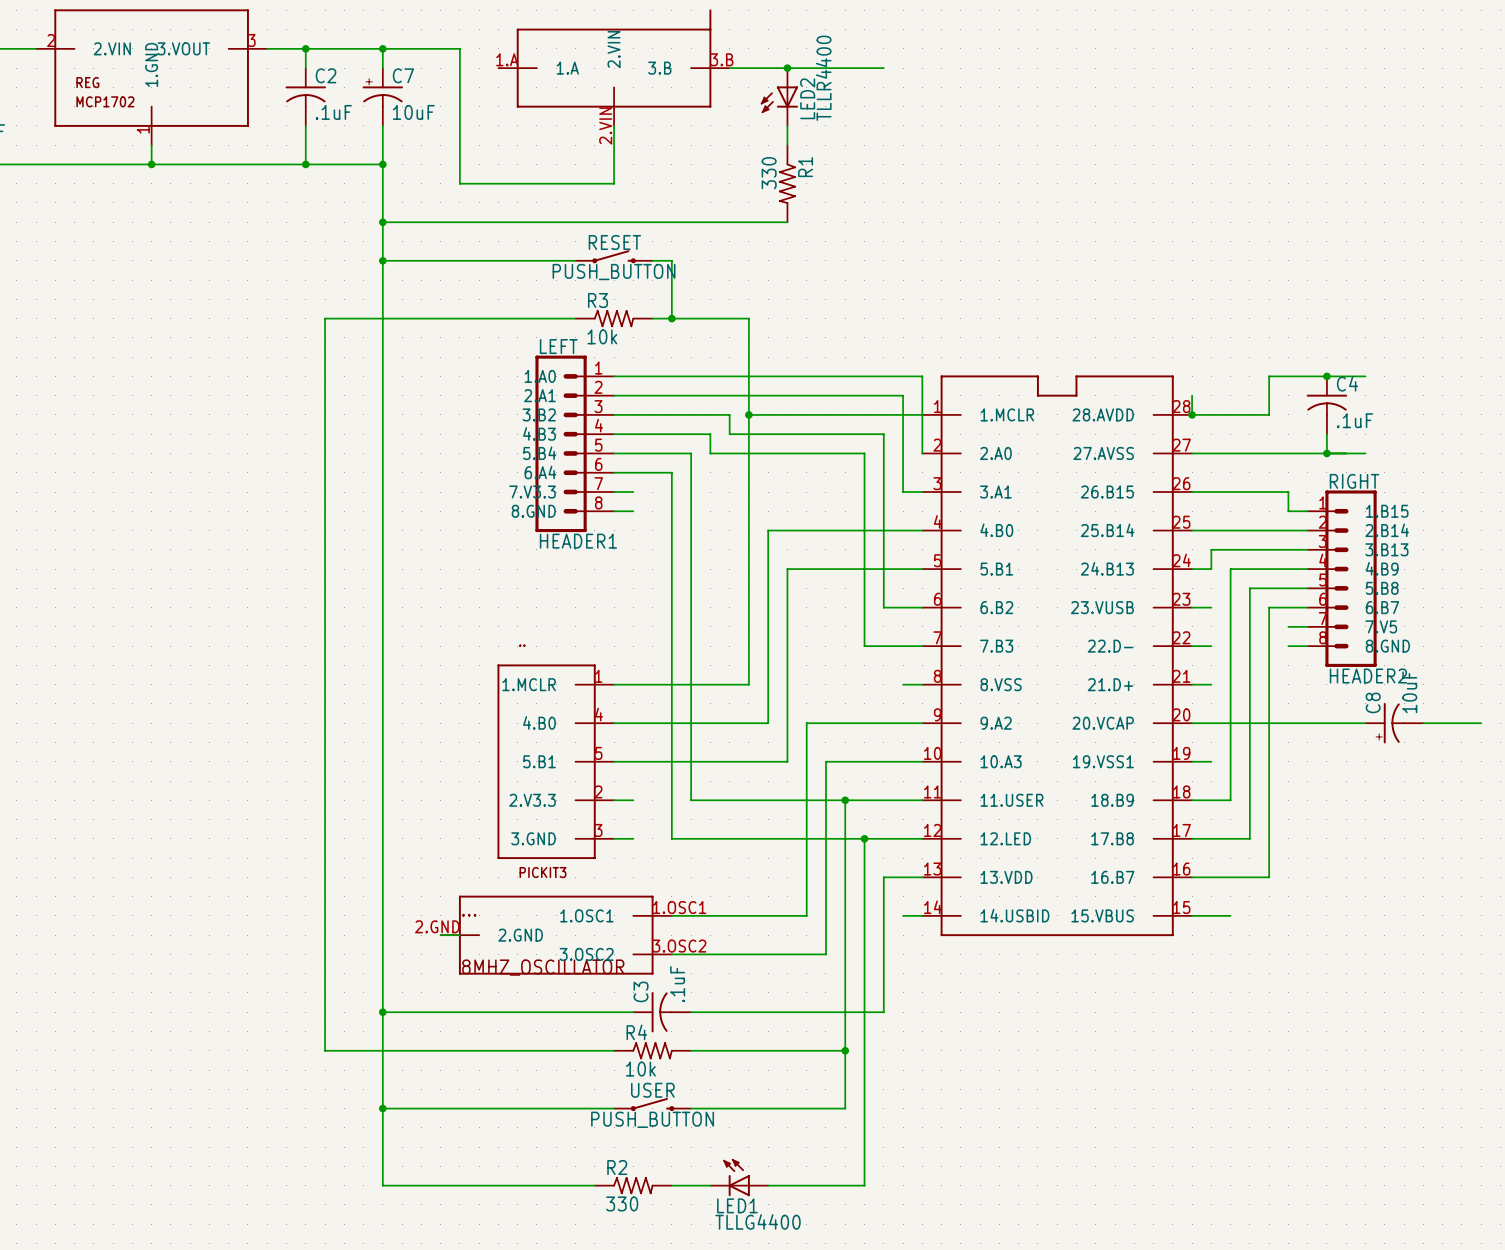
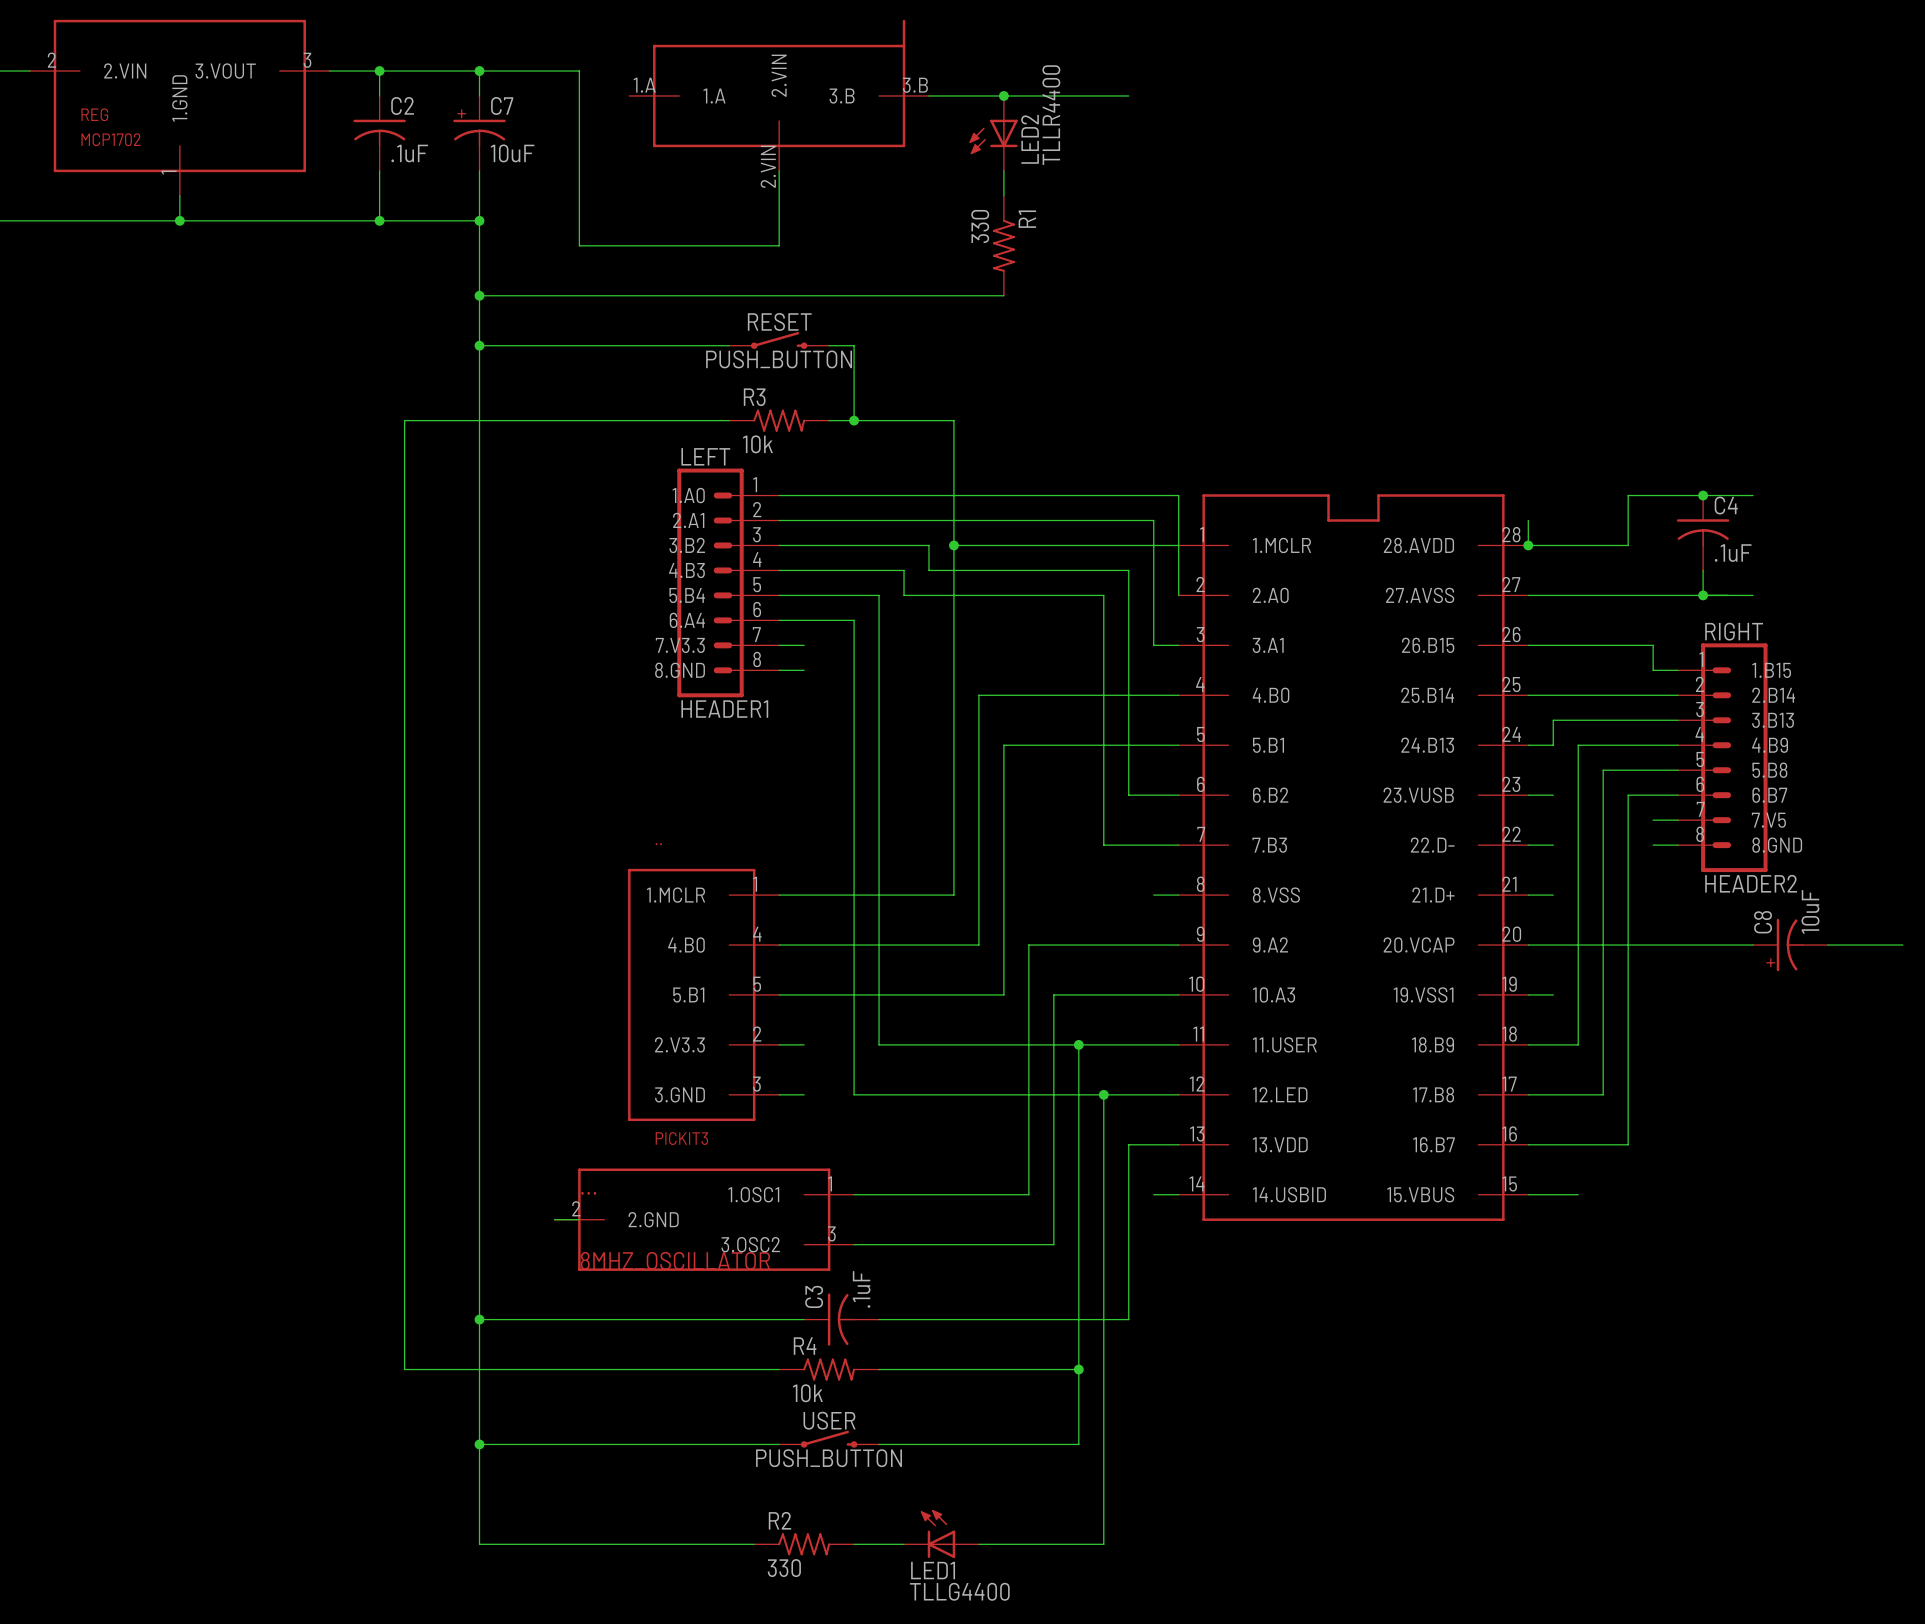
part pin number: 1.OSC1 (679, 907) -> 1 (830, 1183)
part pin number: 2.GND (437, 926) -> 2 (576, 1208)
part pin number: 3.OSC2 (679, 946) -> 3 (831, 1233)

